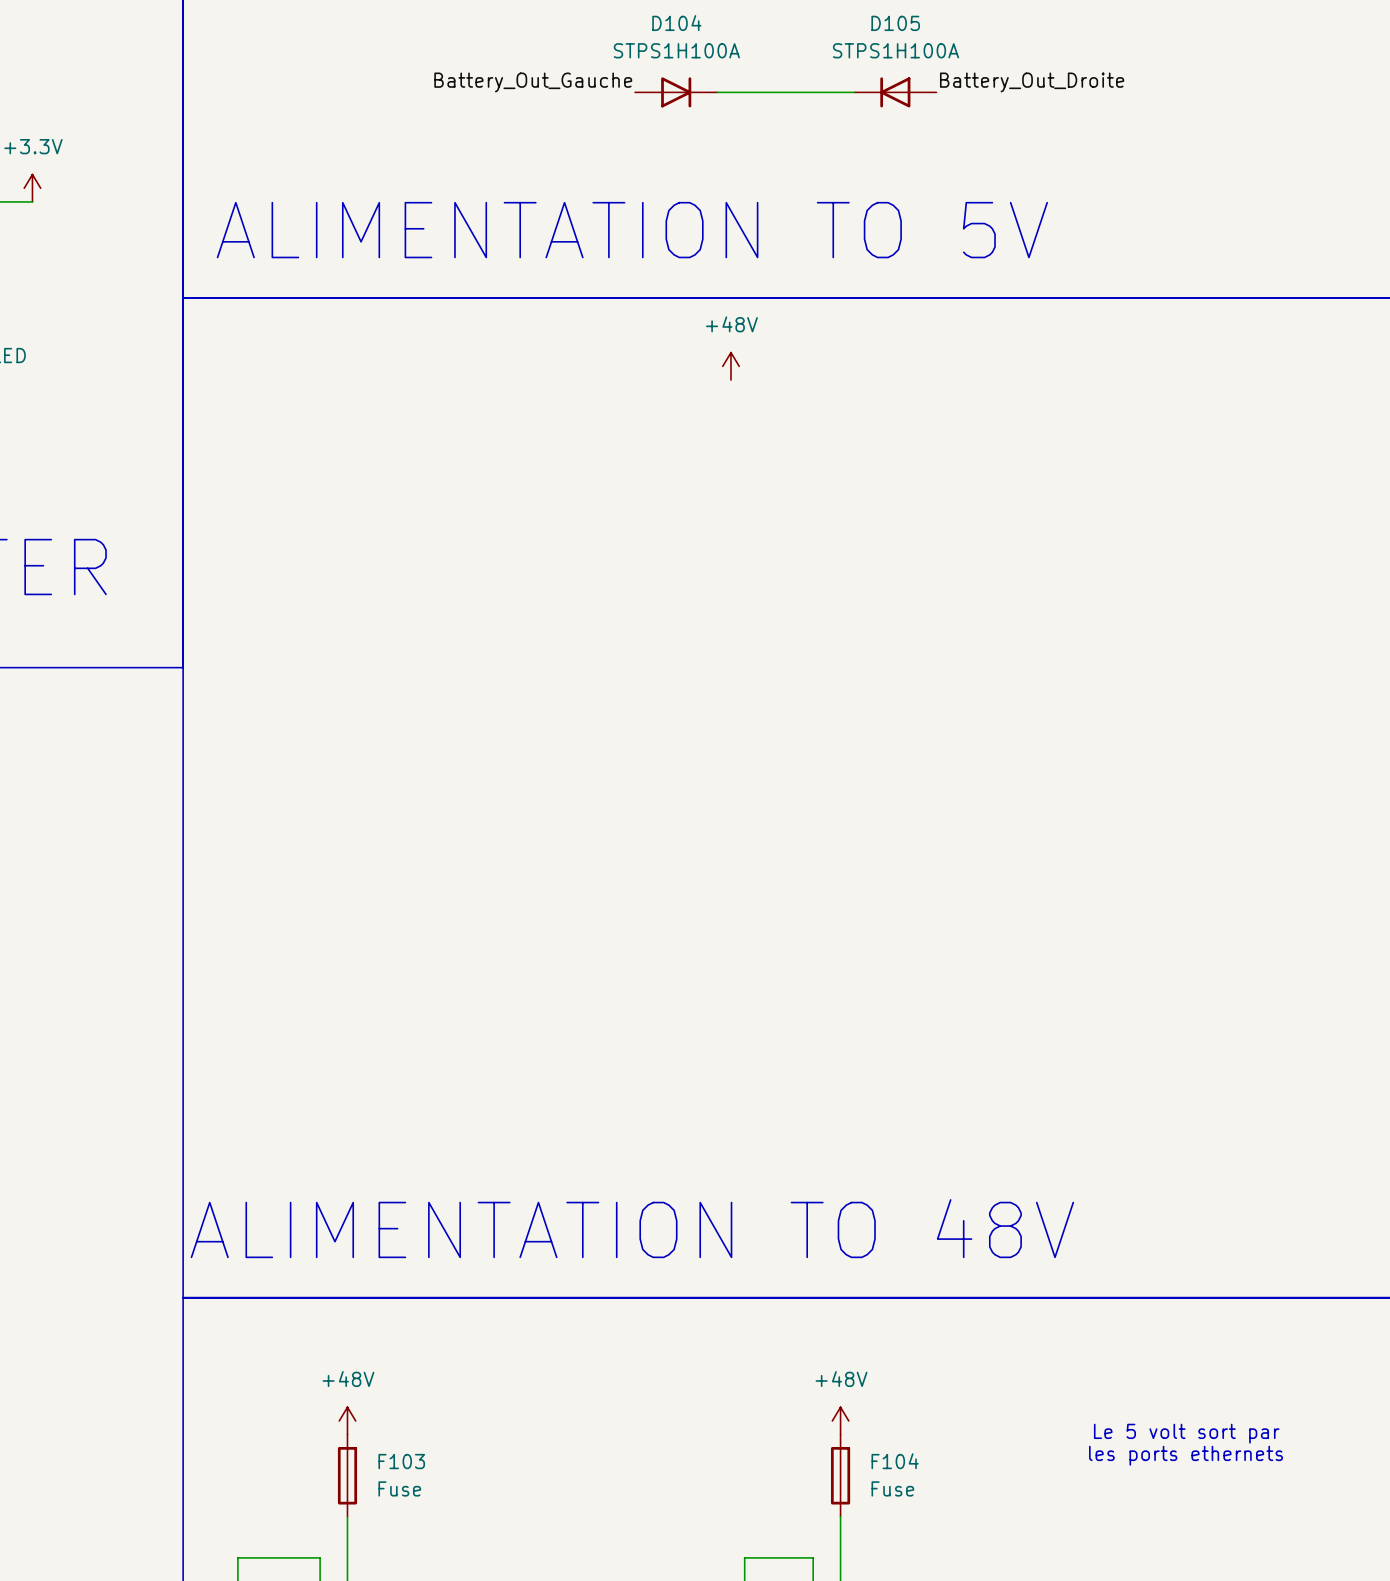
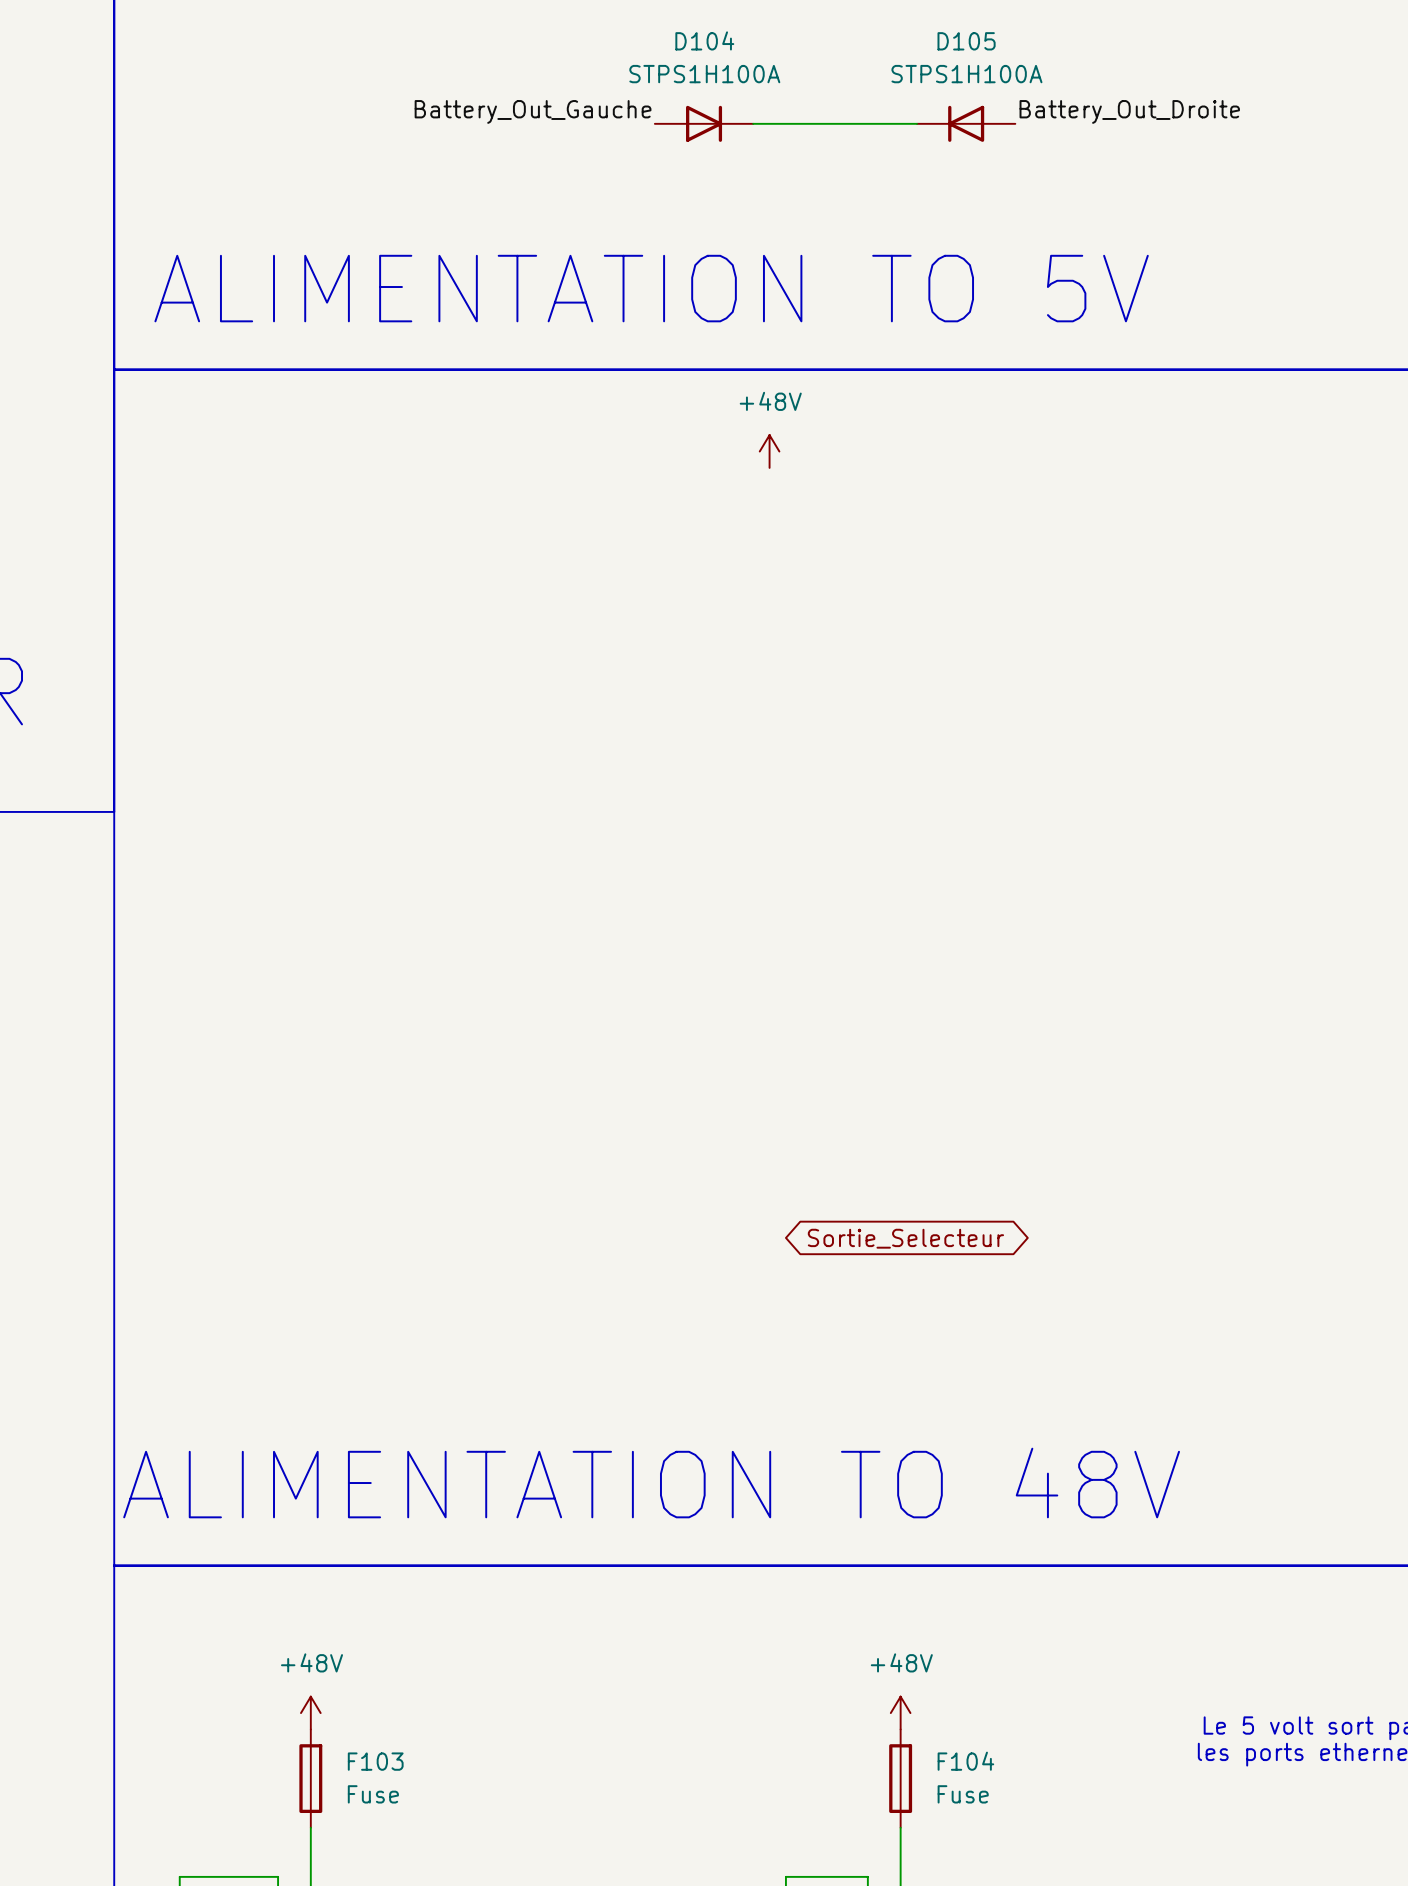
global label: none -> Sortie_Selecteur (905, 1238)

